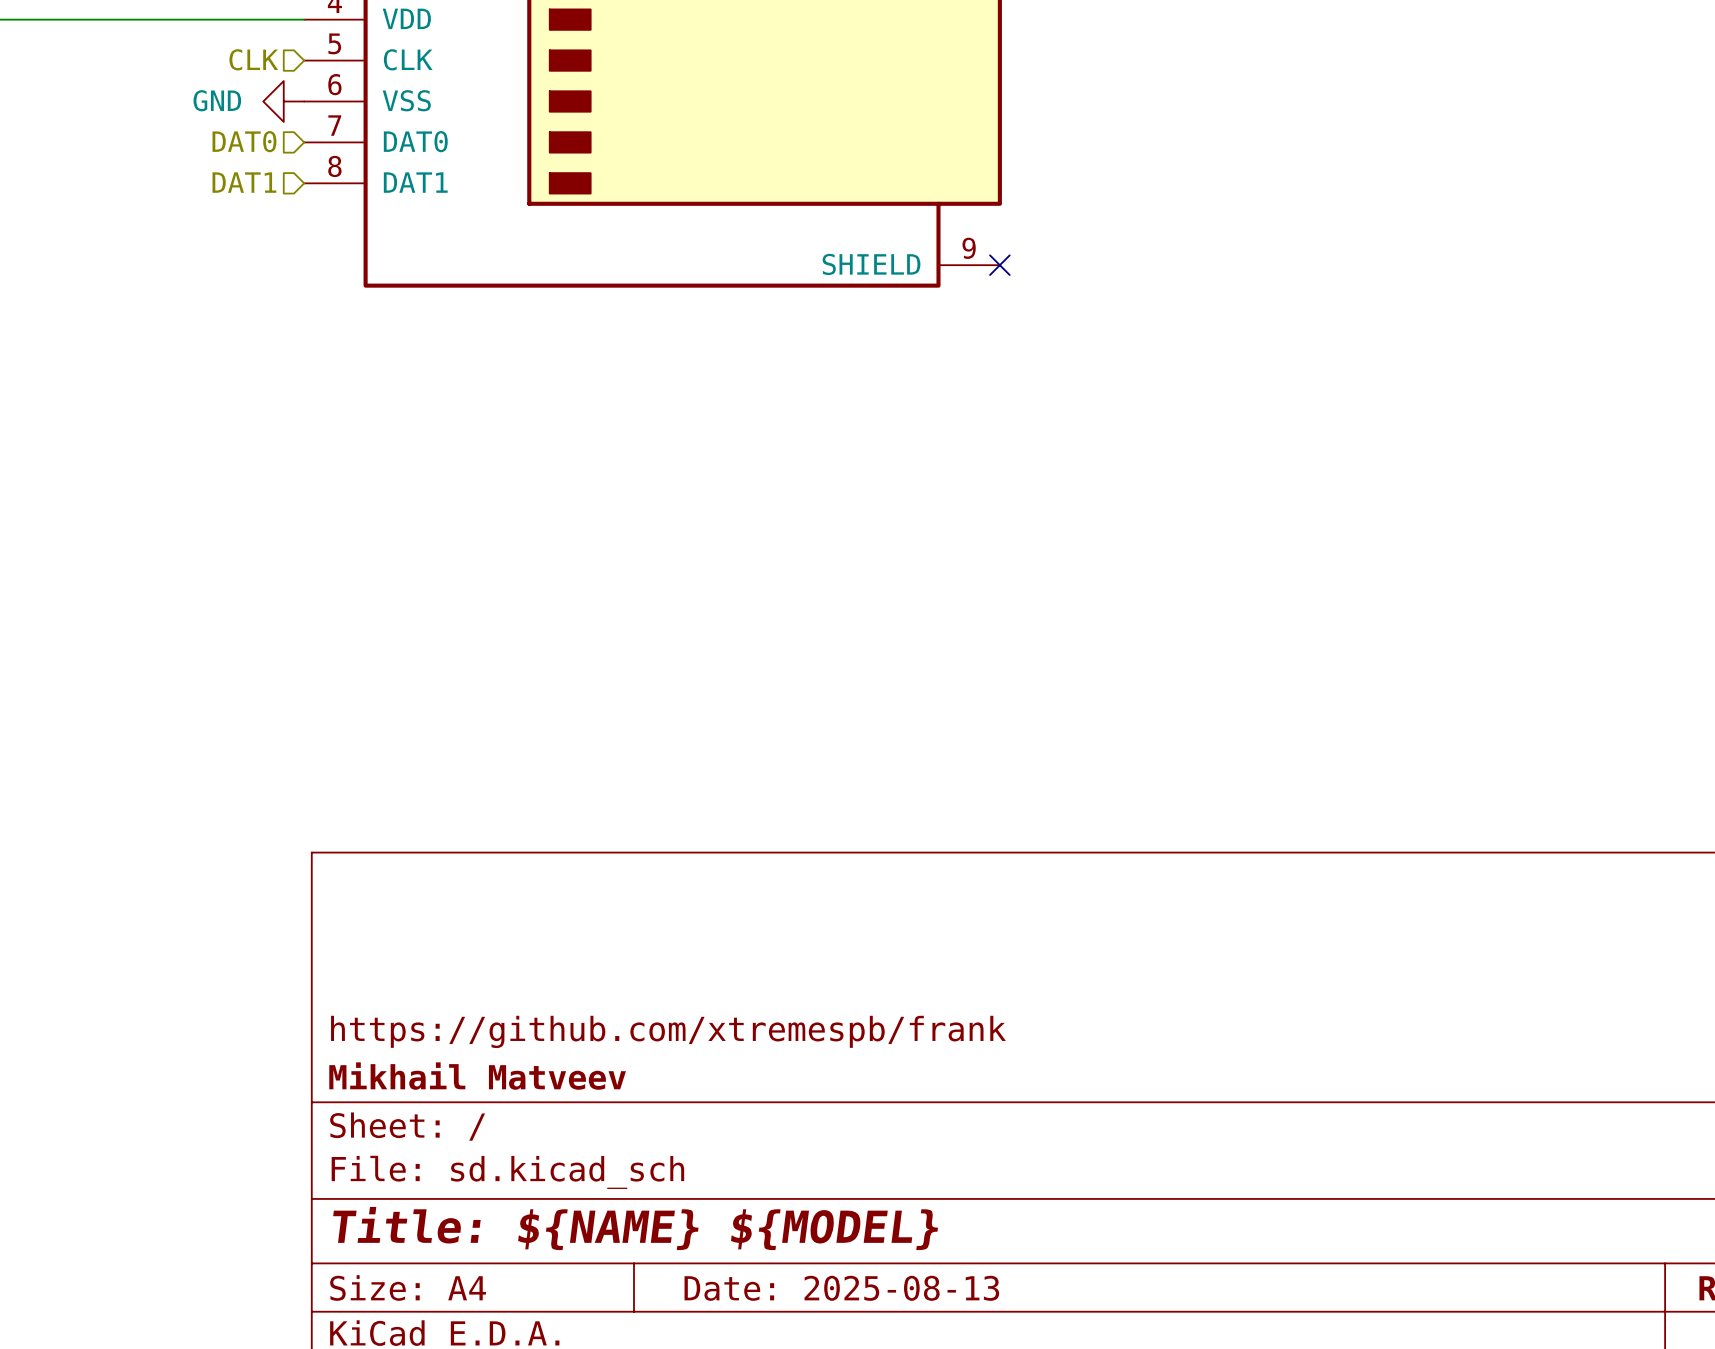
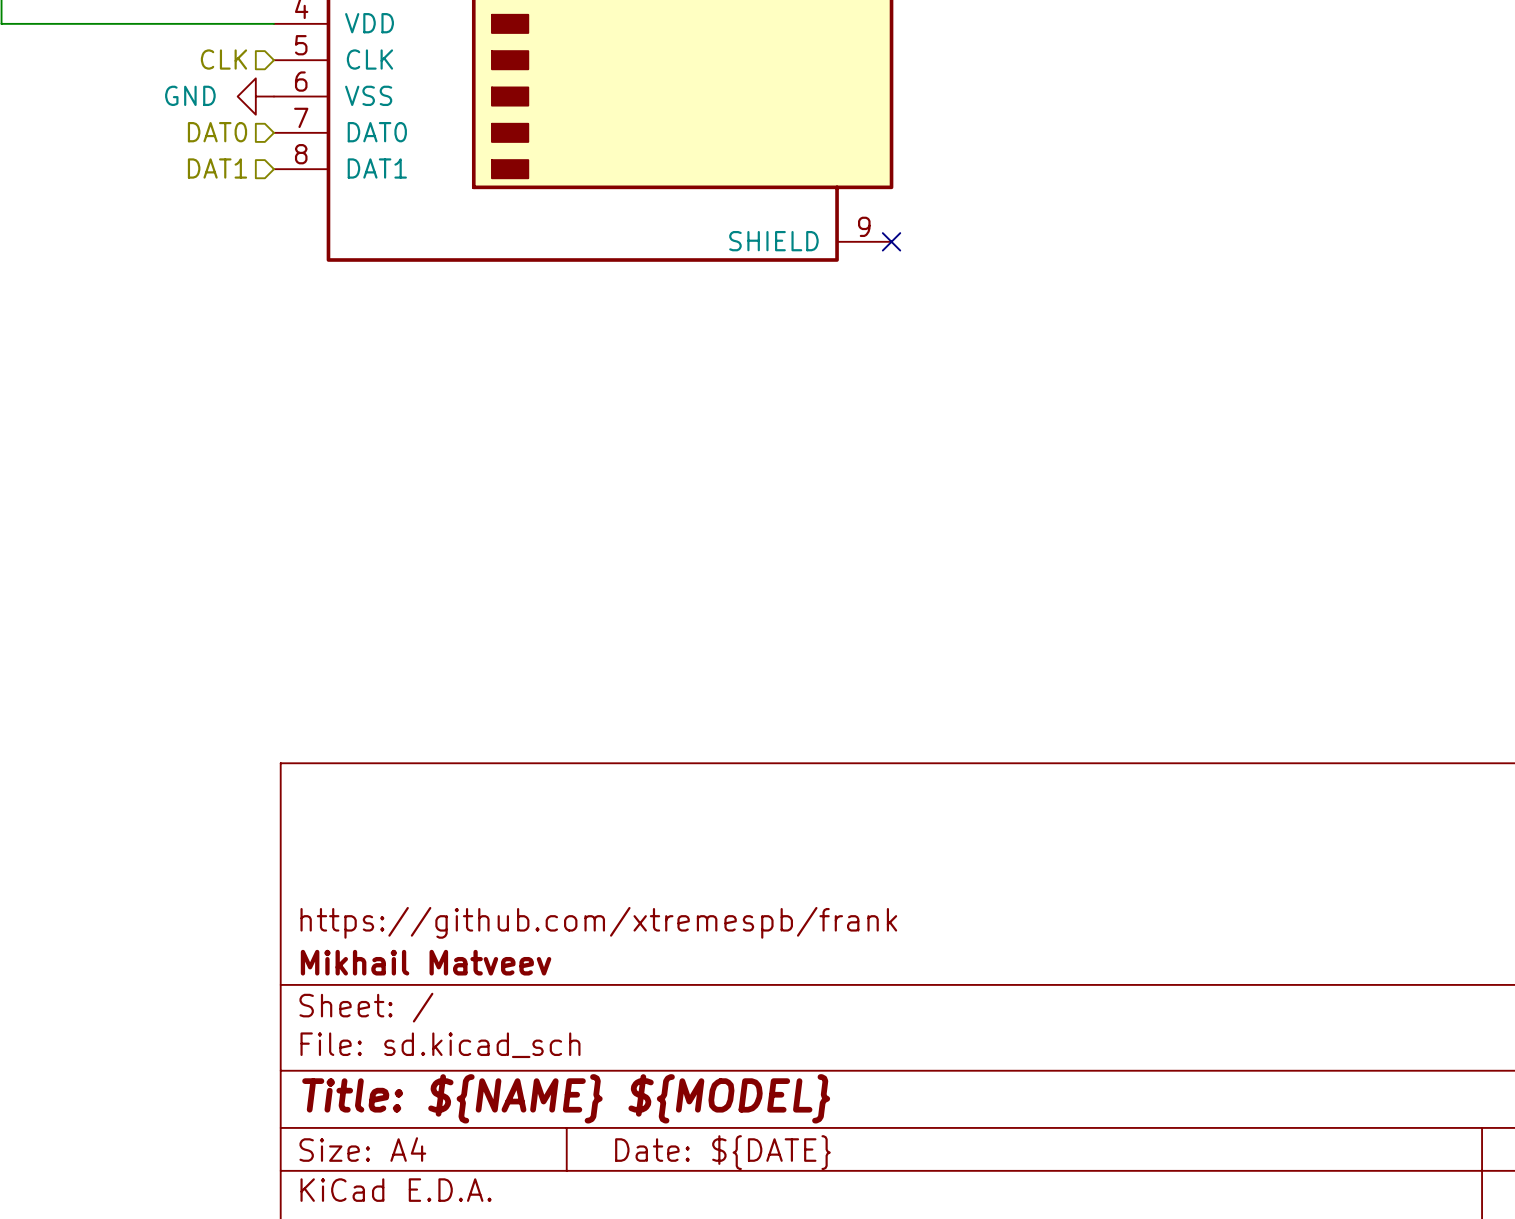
title block: Date: 2025-08-13 (841, 1288) -> Date: ${DATE} (722, 1152)

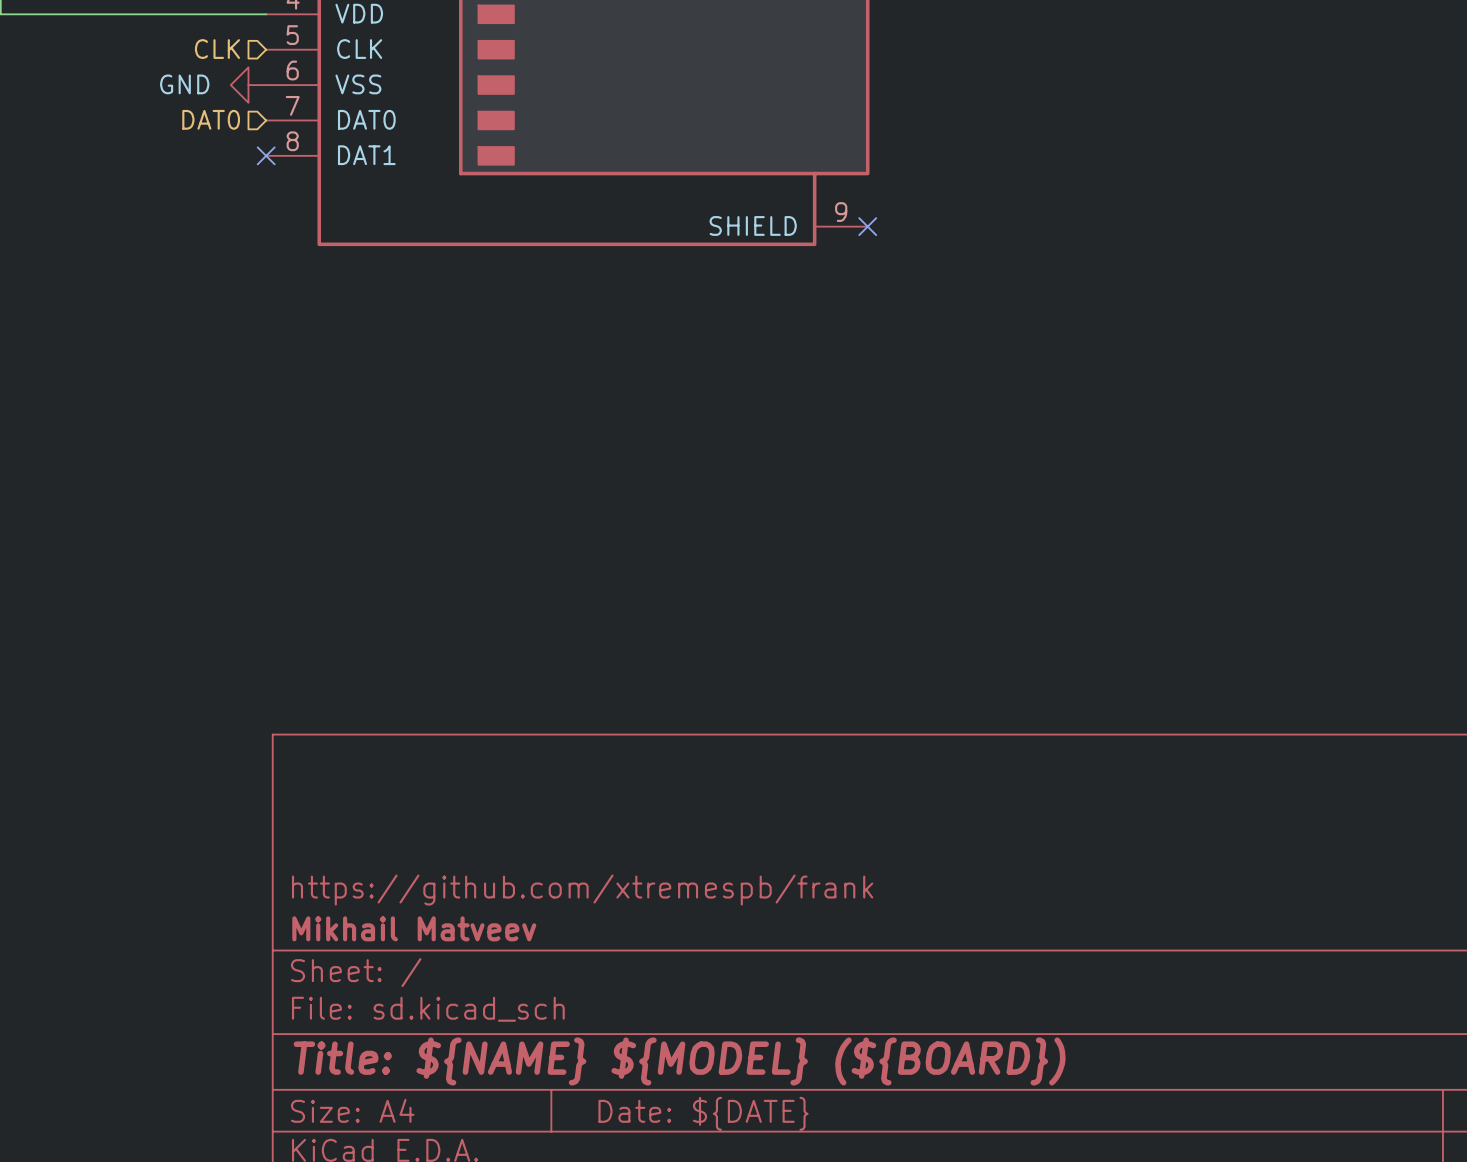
hierarchical label: DAT1 (217, 168) -> none
no-connect mark: none -> (266, 155)
title block: Title: ${NAME} ${MODEL} (566, 1098) -> Title: ${NAME} ${MODEL} (${BOARD}) (679, 1061)

